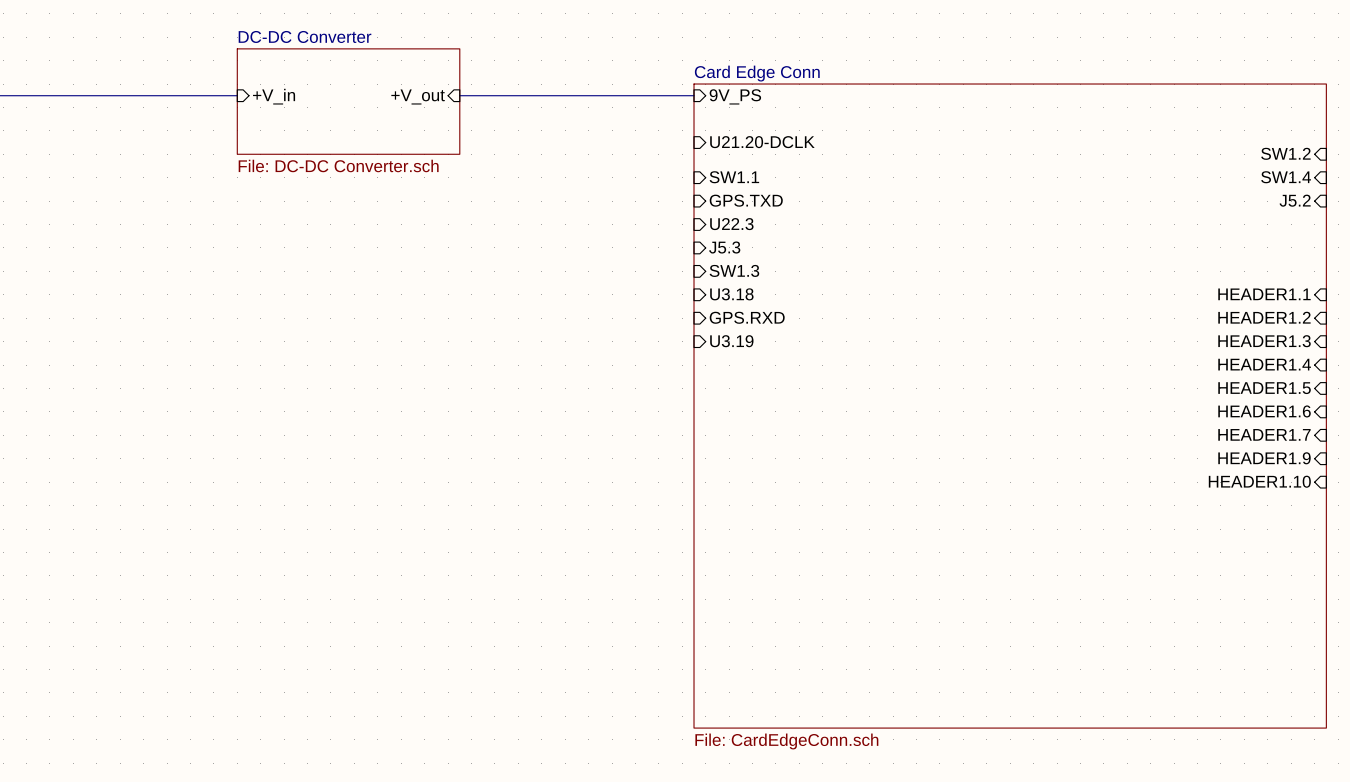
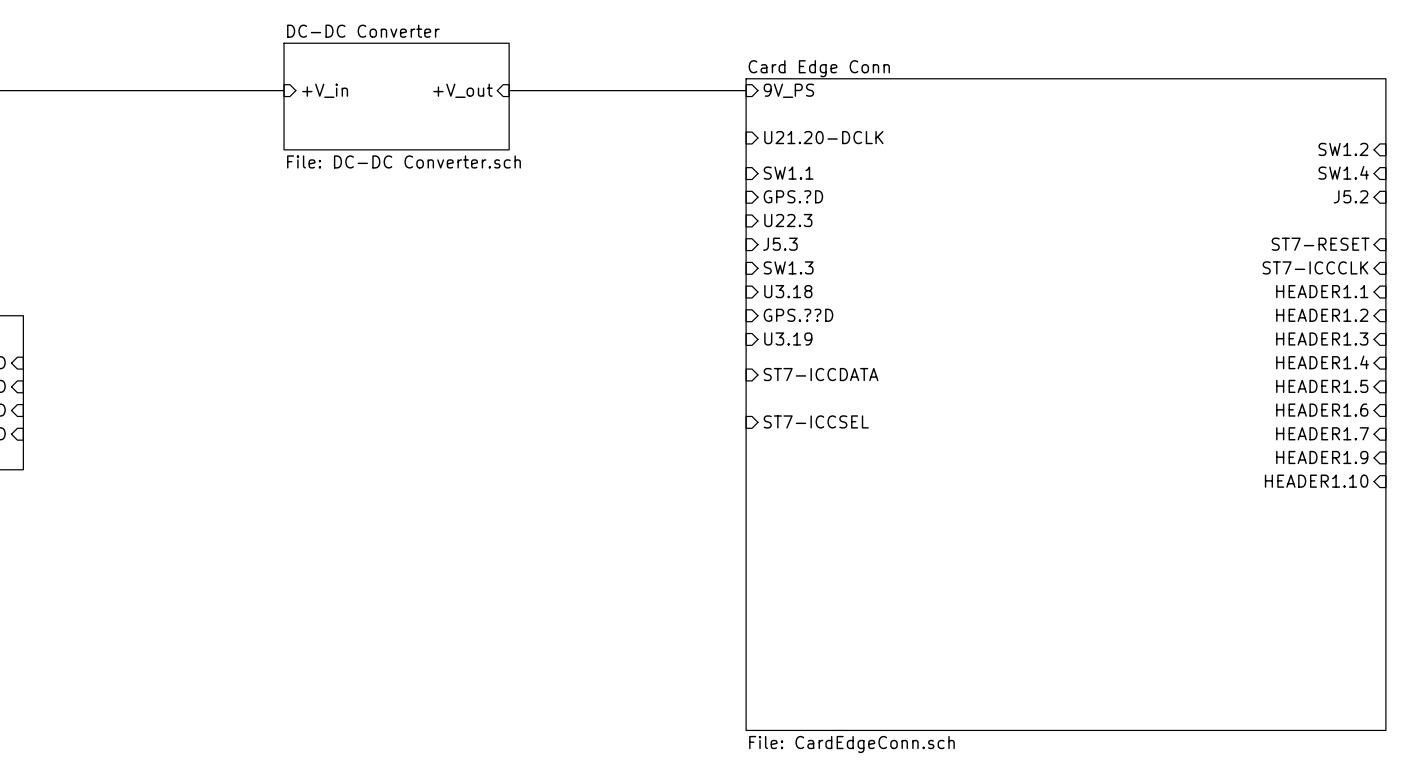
sheet pin: GPS.TXD (746, 200) -> GPS.?D (793, 196)
sheet pin: none -> ST7-RESET (1320, 244)
sheet pin: none -> ST7-ICCCLK (1315, 267)
sheet pin: GPS.RXD (747, 317) -> GPS.??D (798, 315)
sheet pin: none -> ST7-ICCDATA (821, 374)
sheet pin: none -> ST7-ICCSEL (816, 421)

